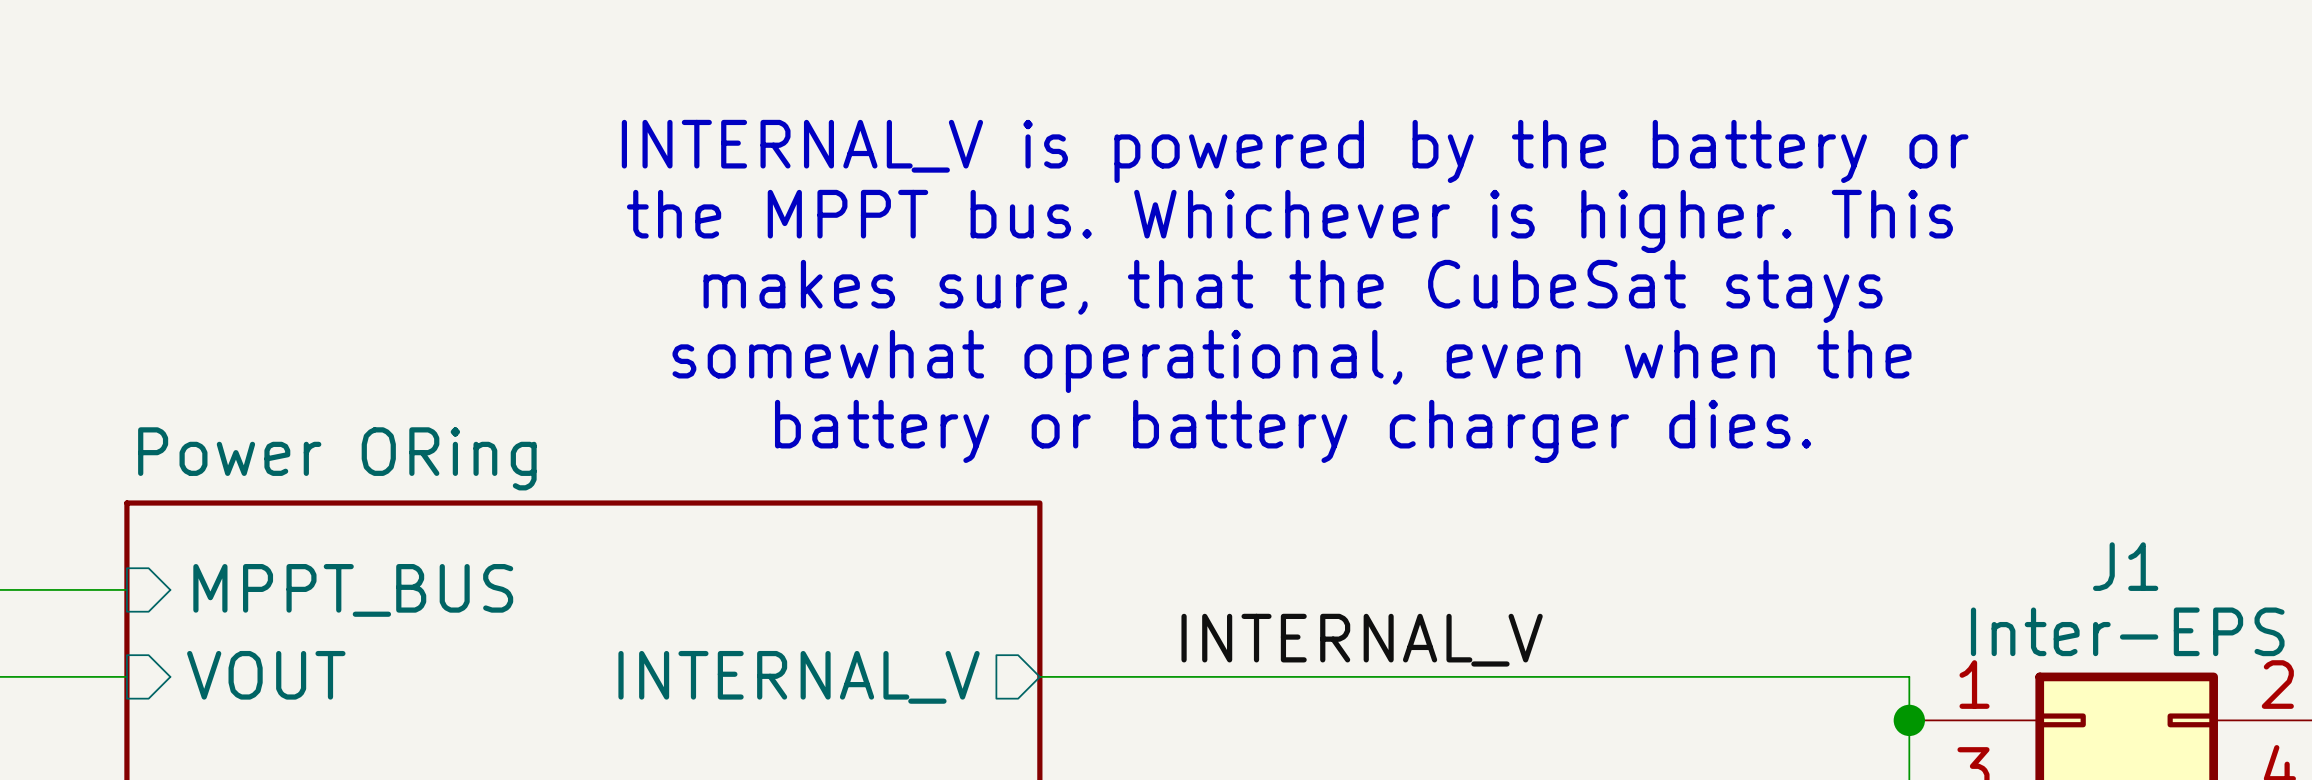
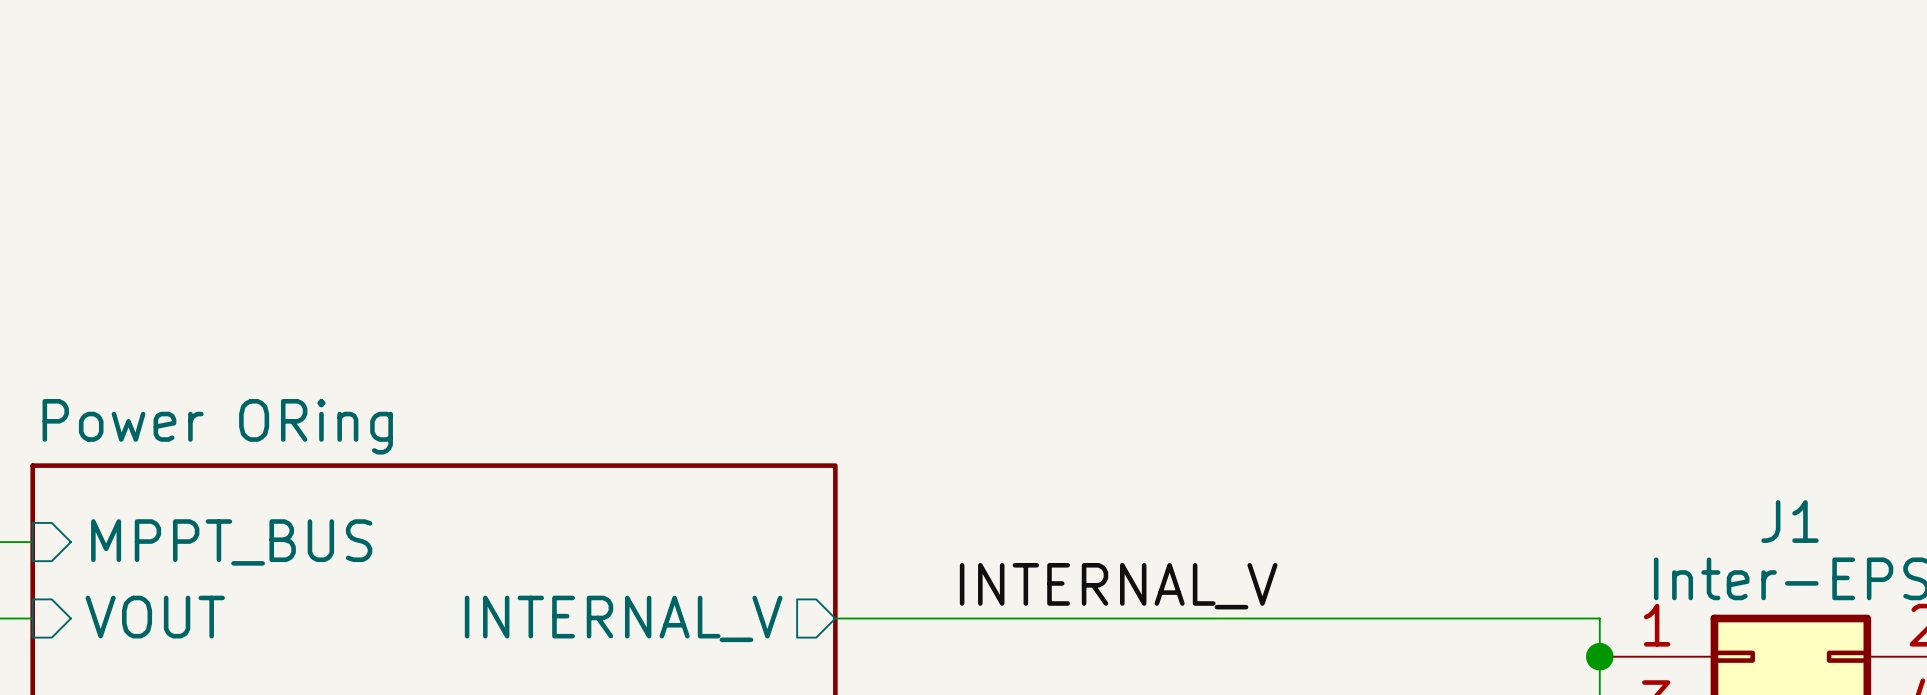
text: INTERNAL_V is powered by the battery or (1295, 151) -> none
text: the MPPT bus. Whichever is higher. This (1289, 221) -> none
text: makes sure, that the CubeSat stays (1293, 291) -> none
text: somewhat operational, even when the (1292, 361) -> none
text: battery or battery charger dies. (1293, 431) -> none

